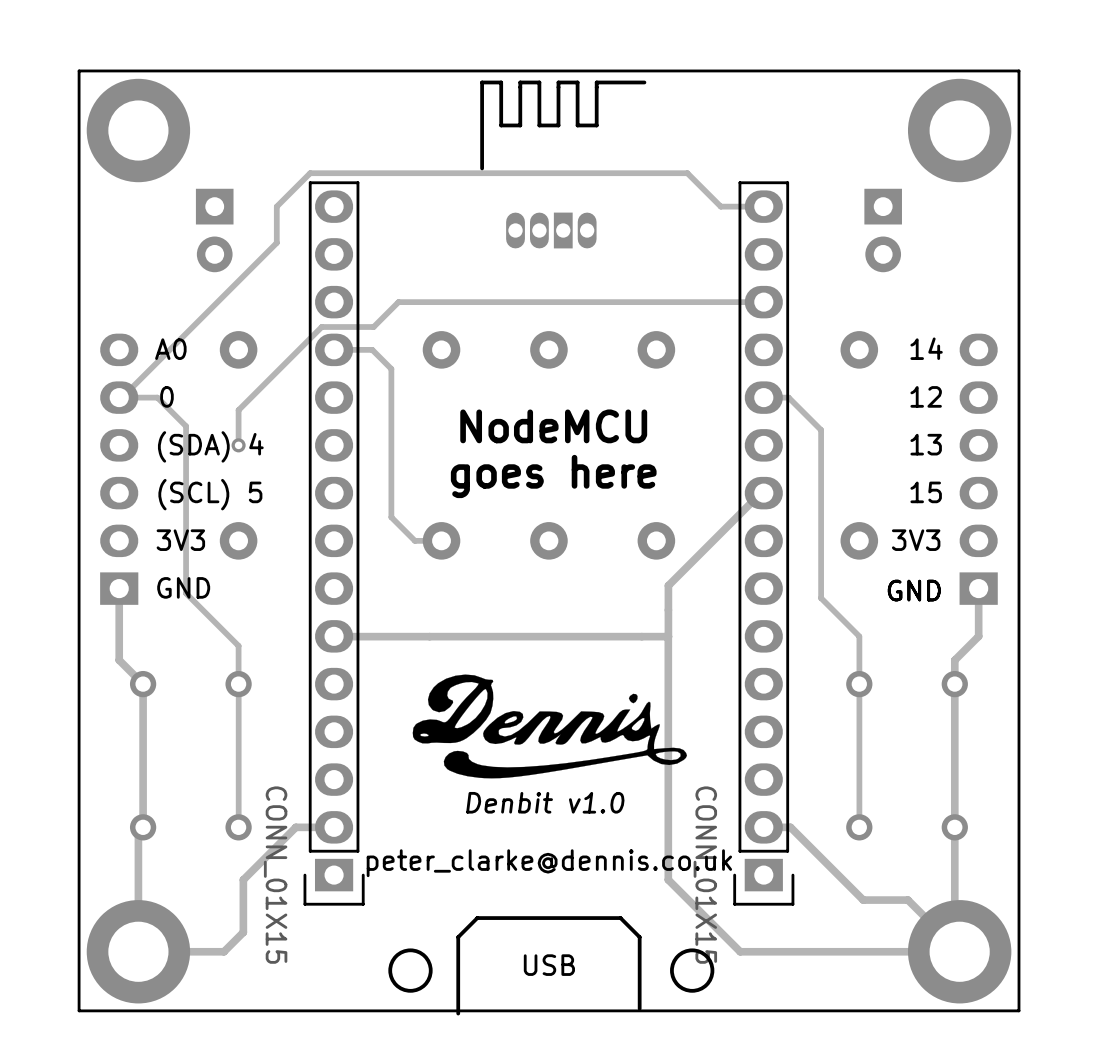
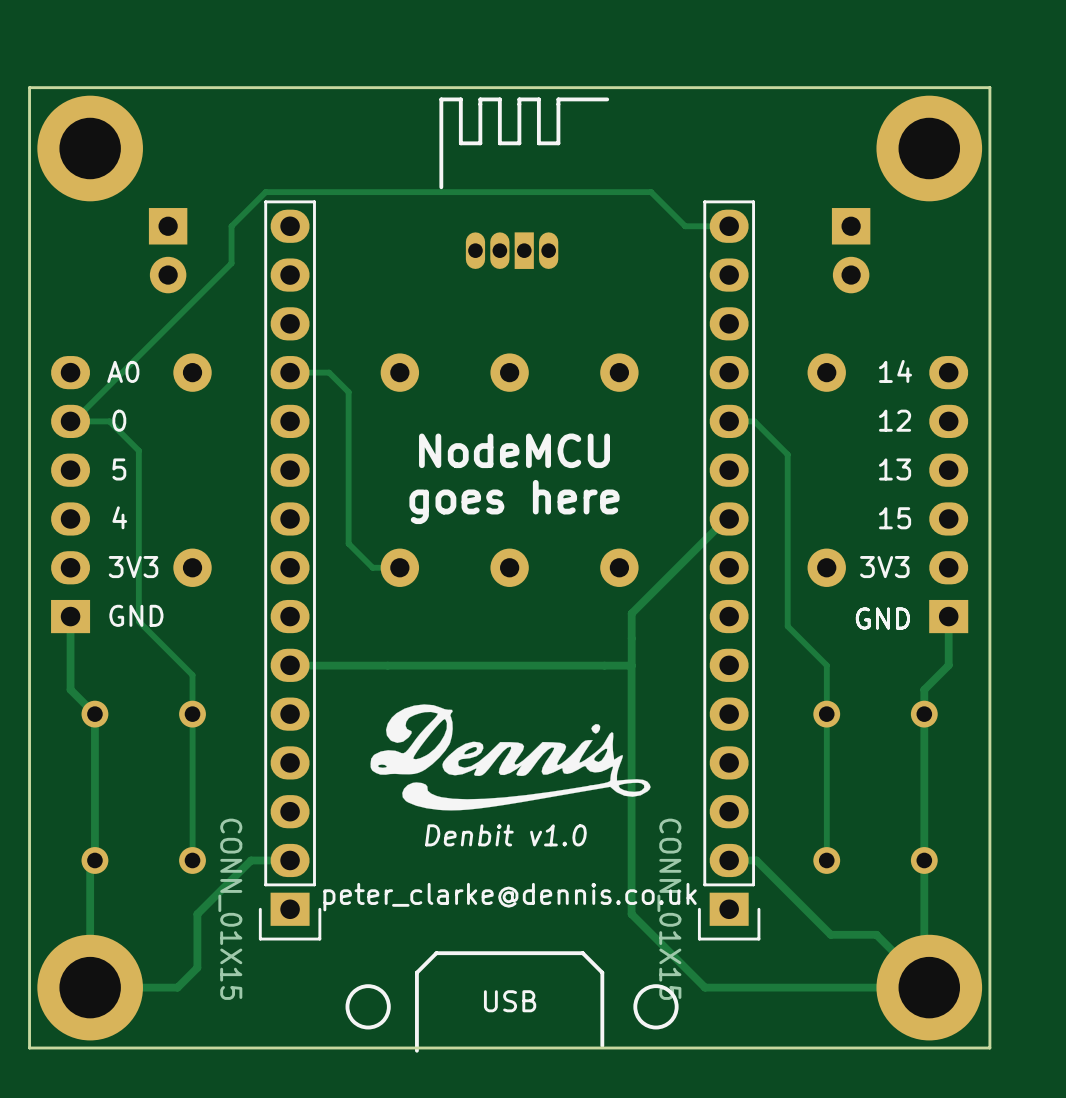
track: (763, 302) (398, 302) (373, 327) (321, 327) (238, 410) (238, 445) -> none
text: none -> 5 (119, 469)
via: (238, 445) -> none
text: (SDA) 4 (210, 446) -> none
text: none -> 4 (119, 517)
text: (SCL) 5 (210, 494) -> none

